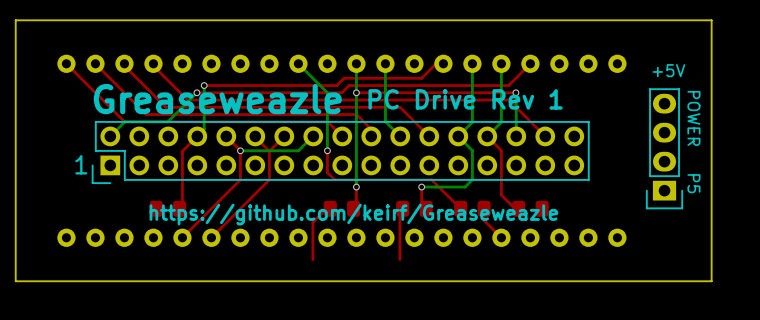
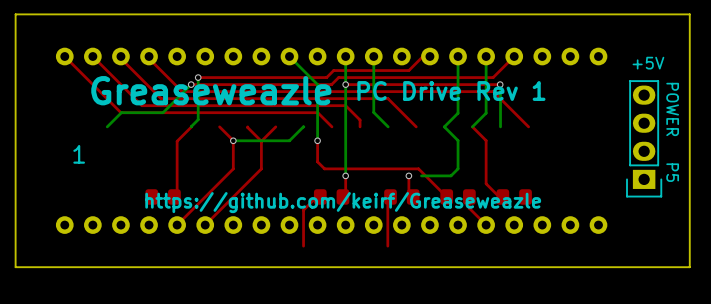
part: (340, 152) -> none
bottom track: (434, 187) (421, 187) -> none

